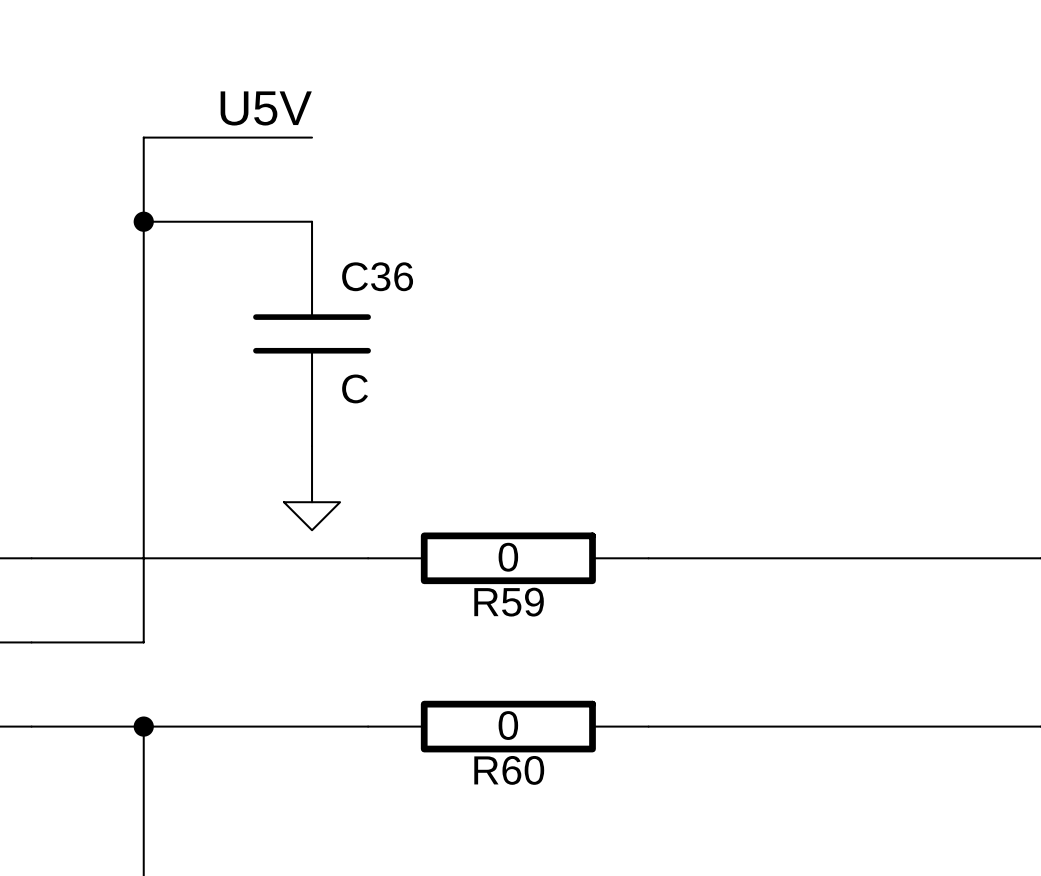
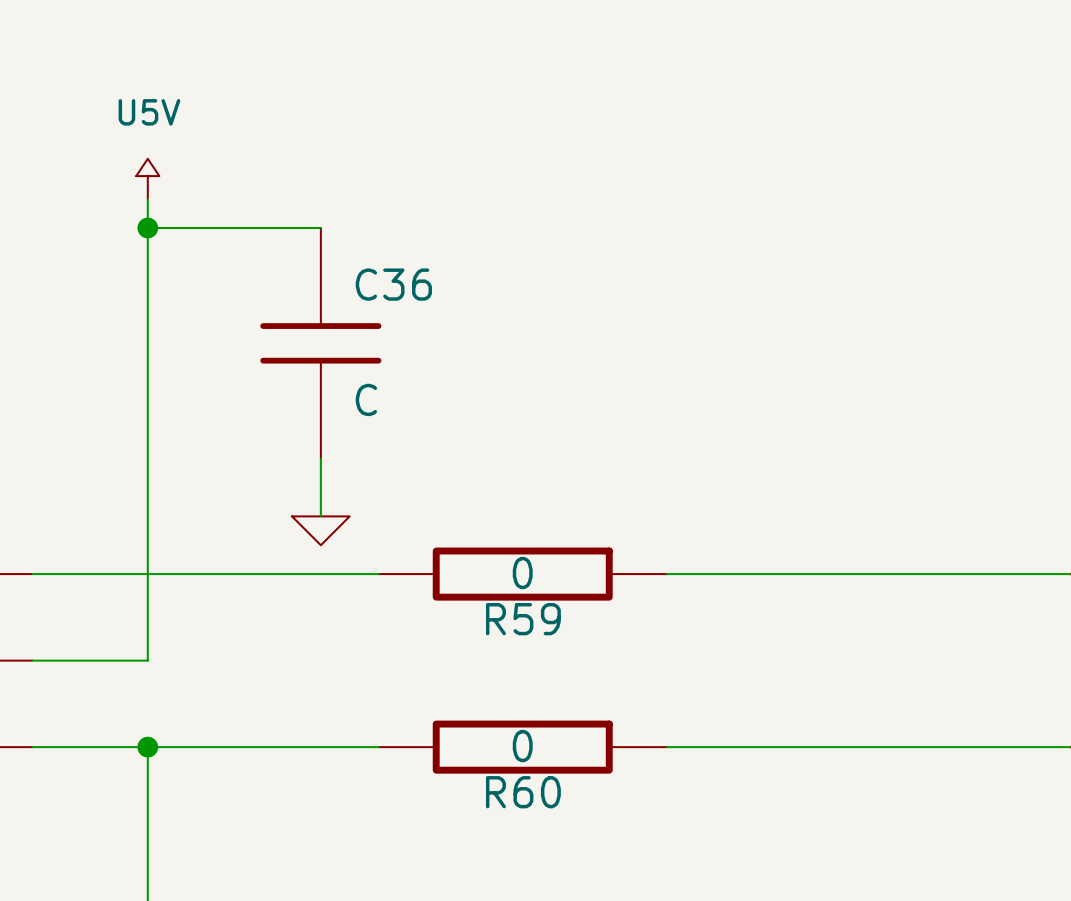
label: U5V (266, 108) -> none
wire: (312, 137) (143, 137) (143, 193) -> none
power symbol: none -> U5V (147, 178)

